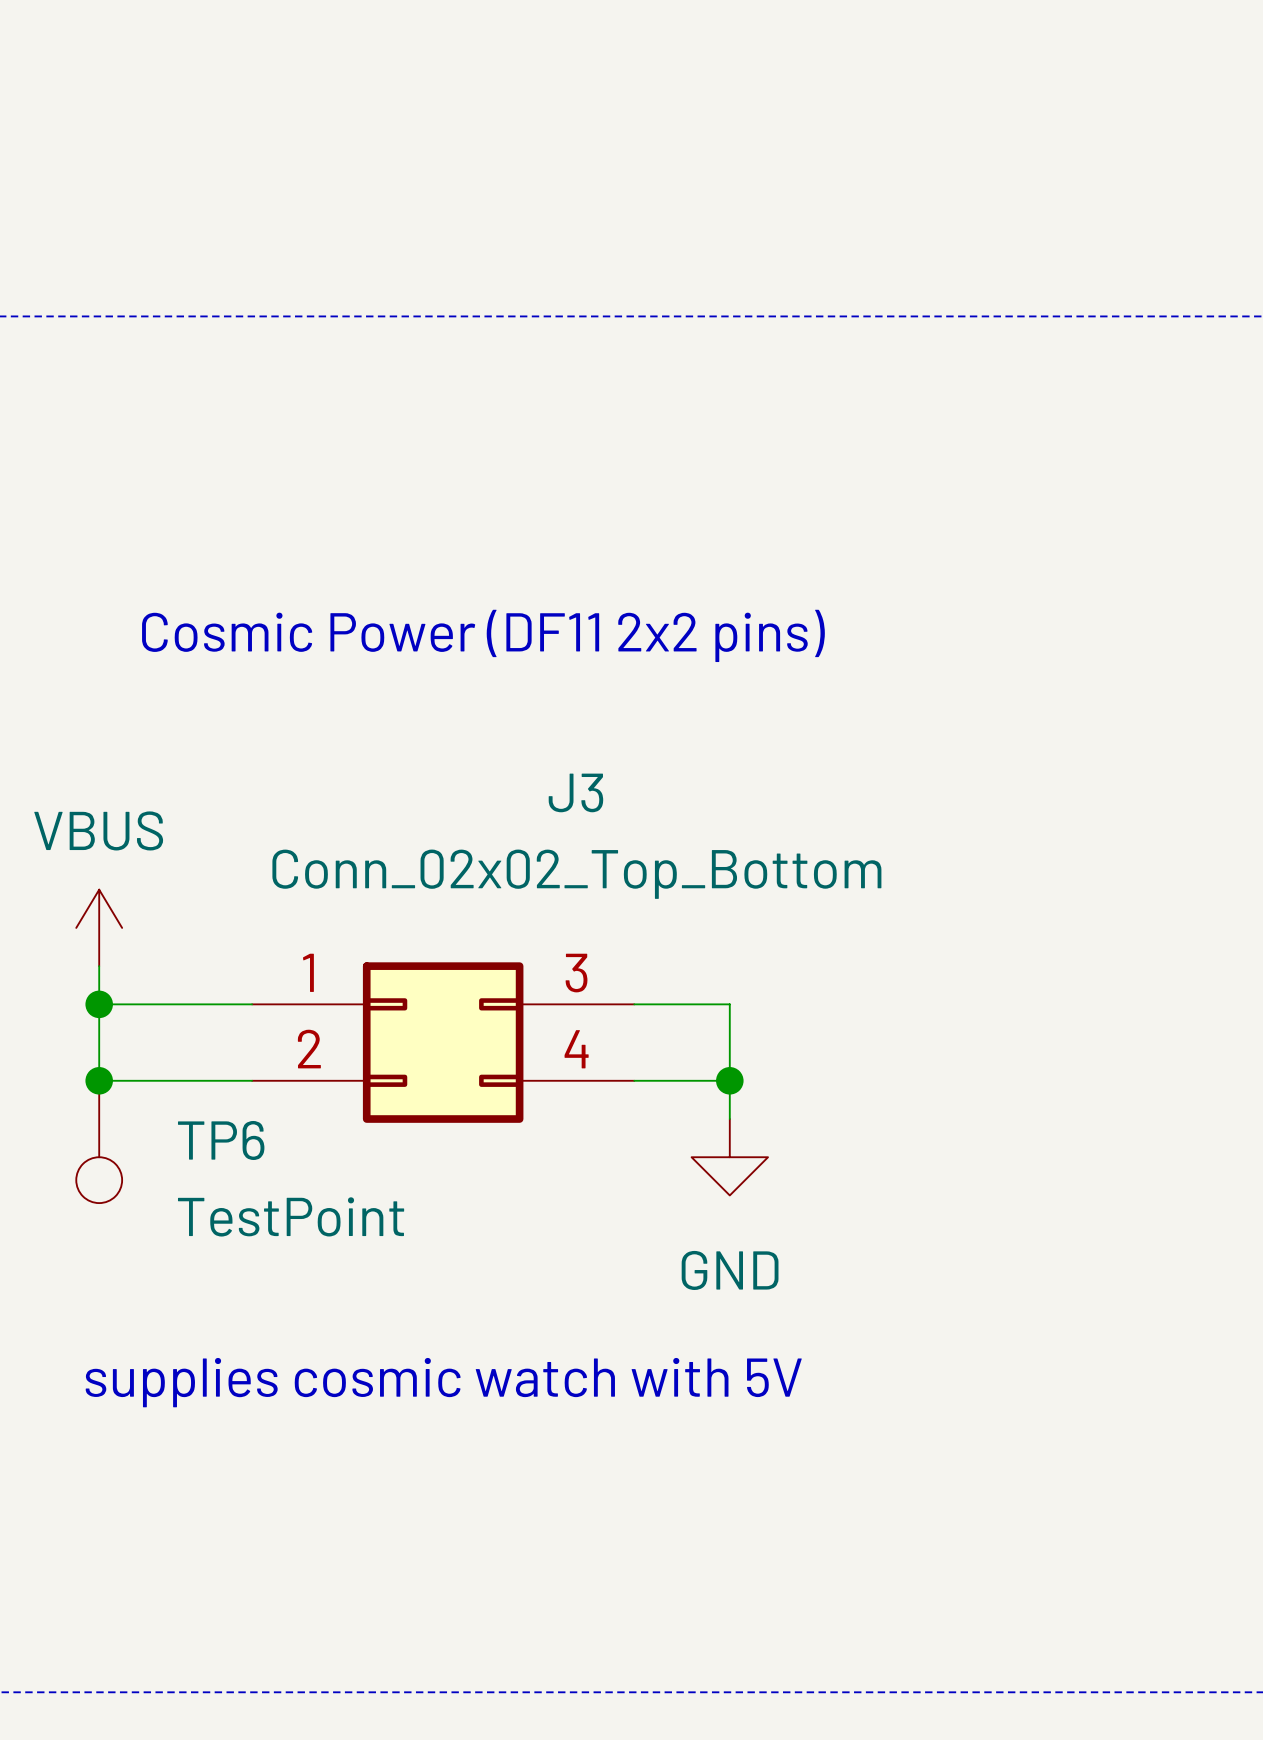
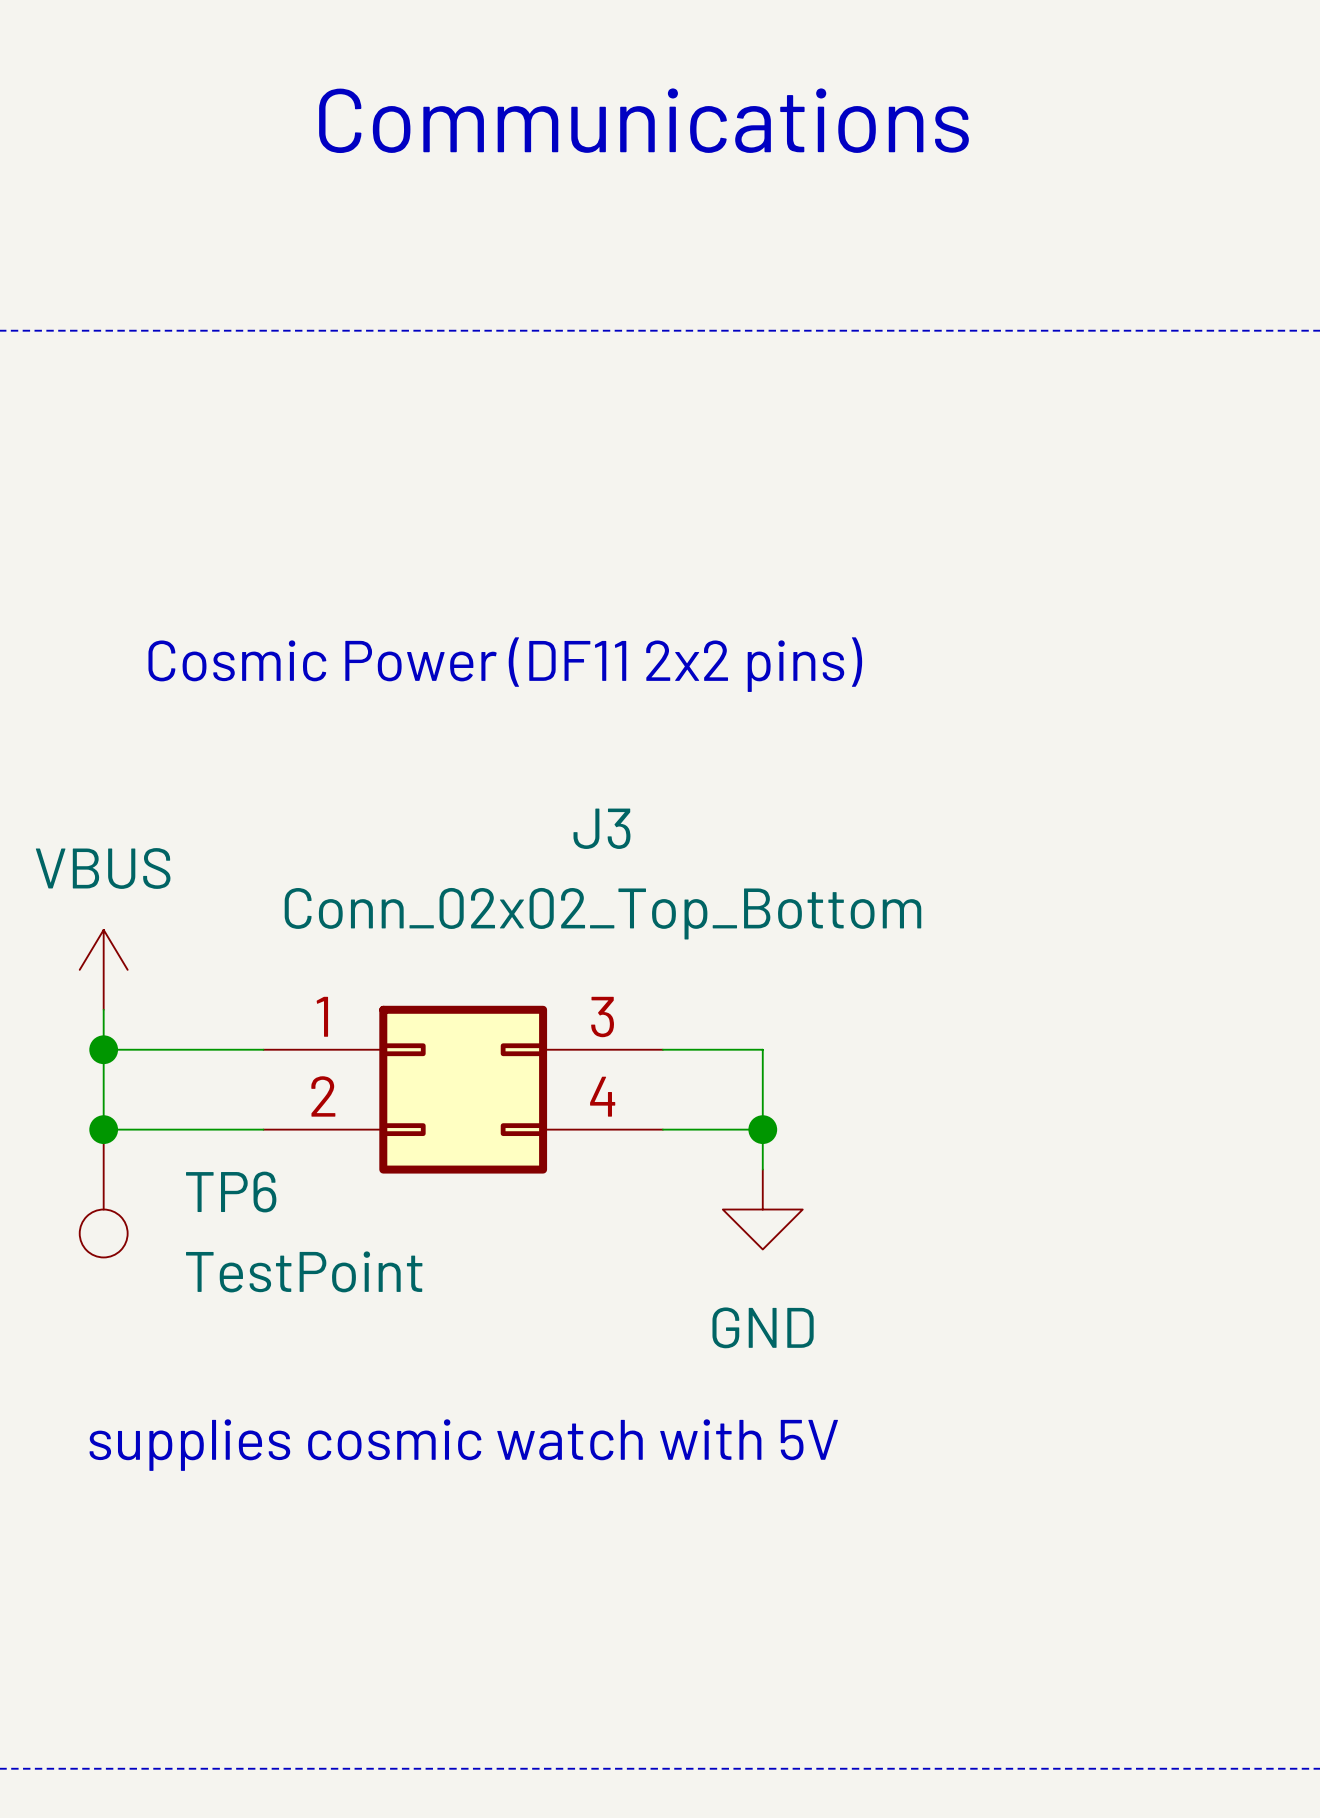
text: none -> Communications (643, 120)

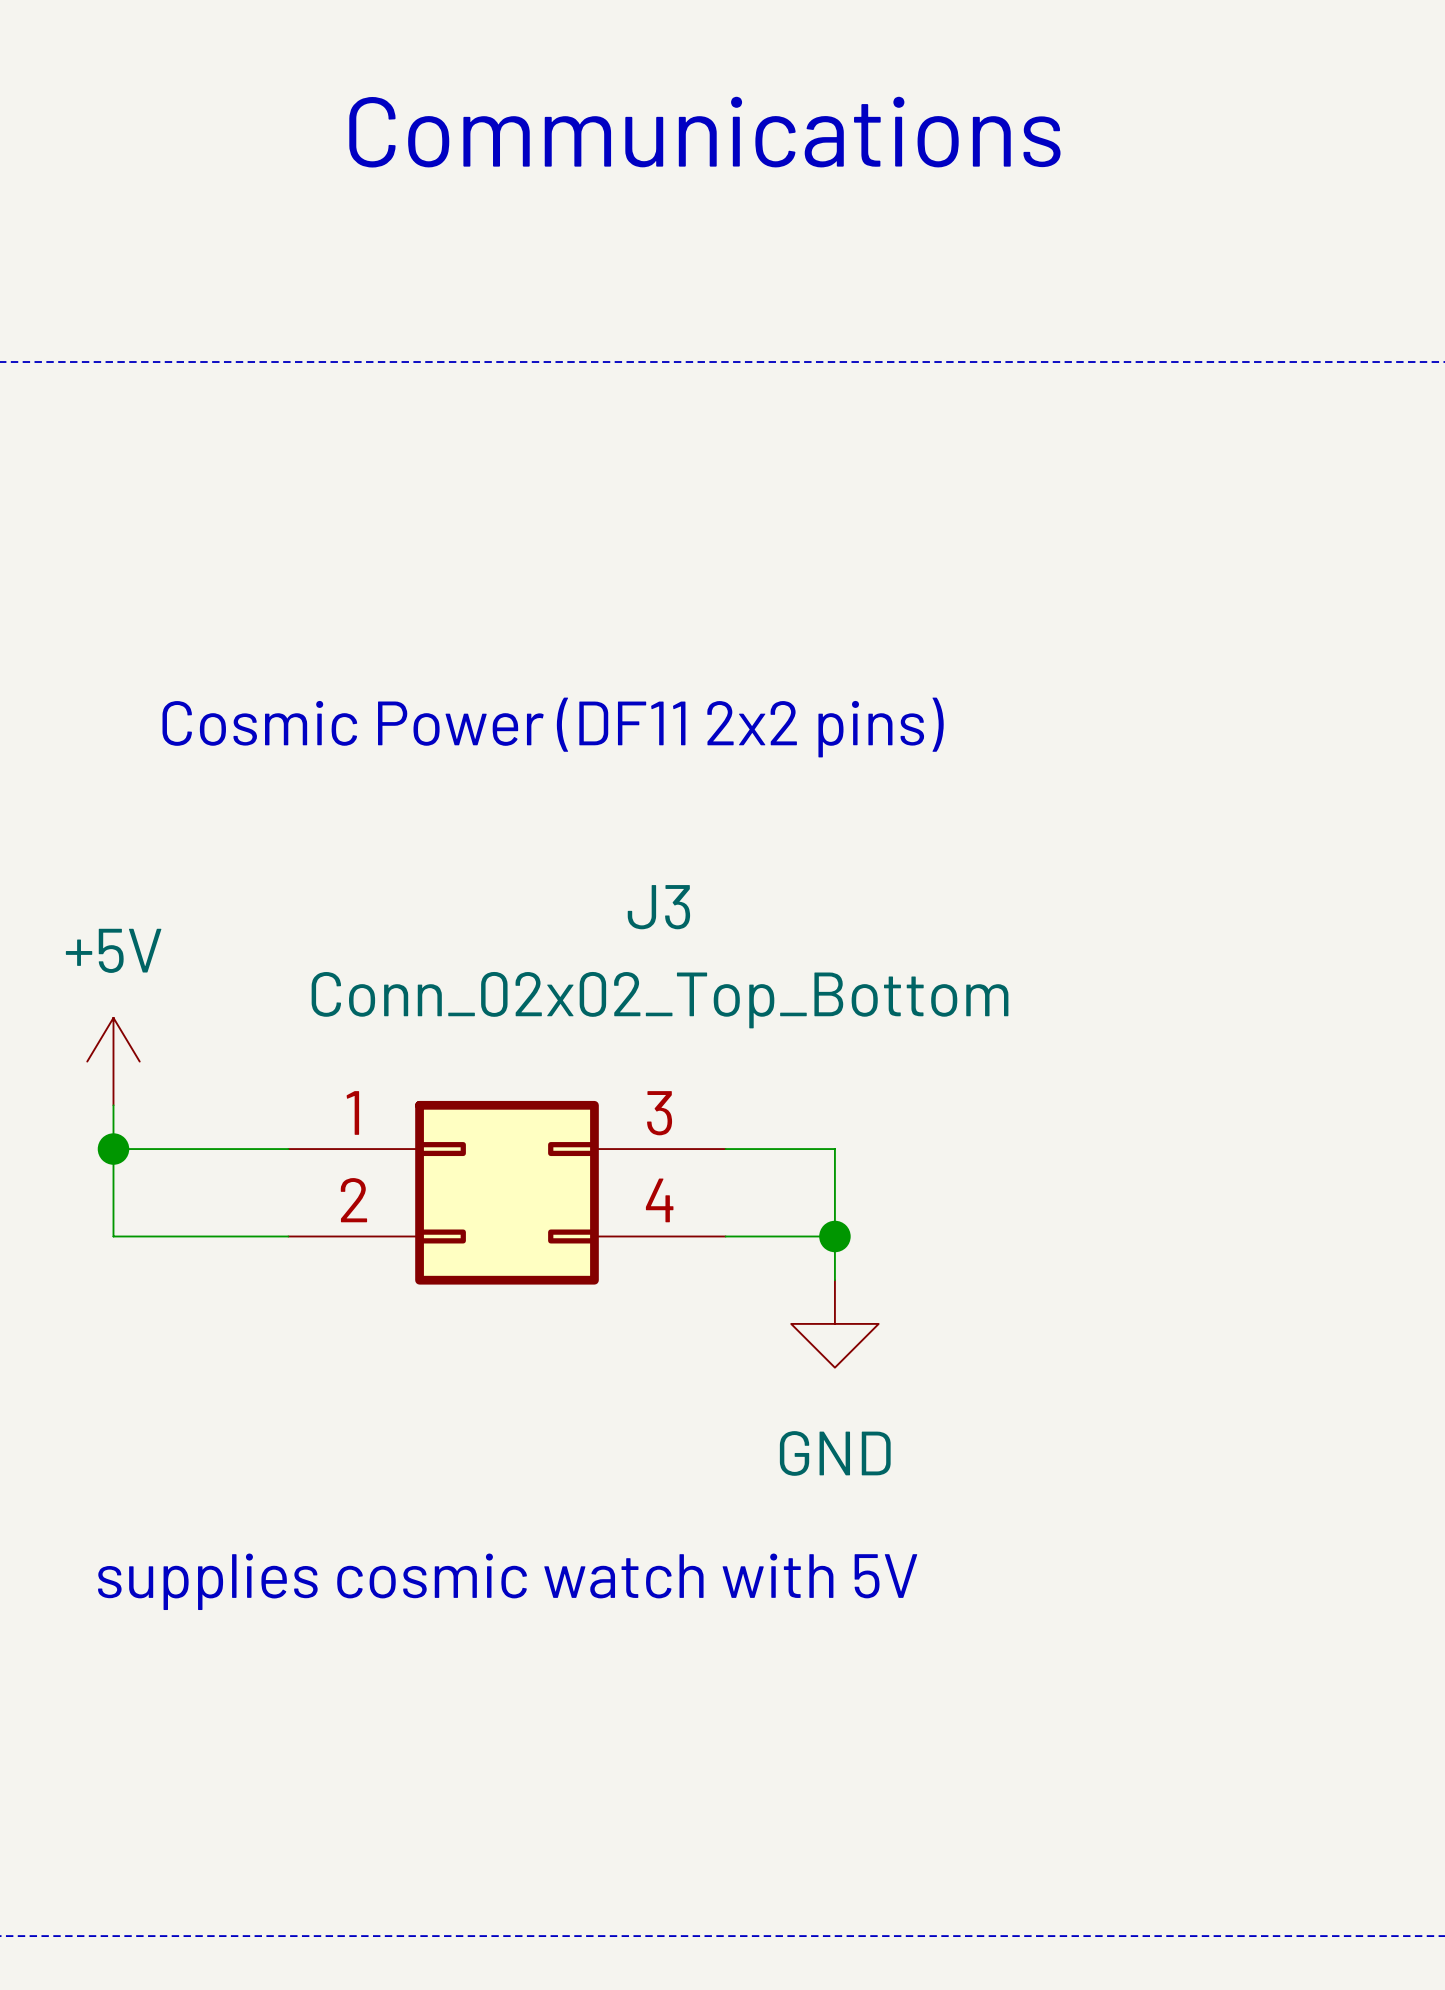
power symbol: VBUS (103, 969) -> +5V (113, 1061)
junction: (103, 1129) -> none
TP6: TestPoint (103, 1193) -> none

